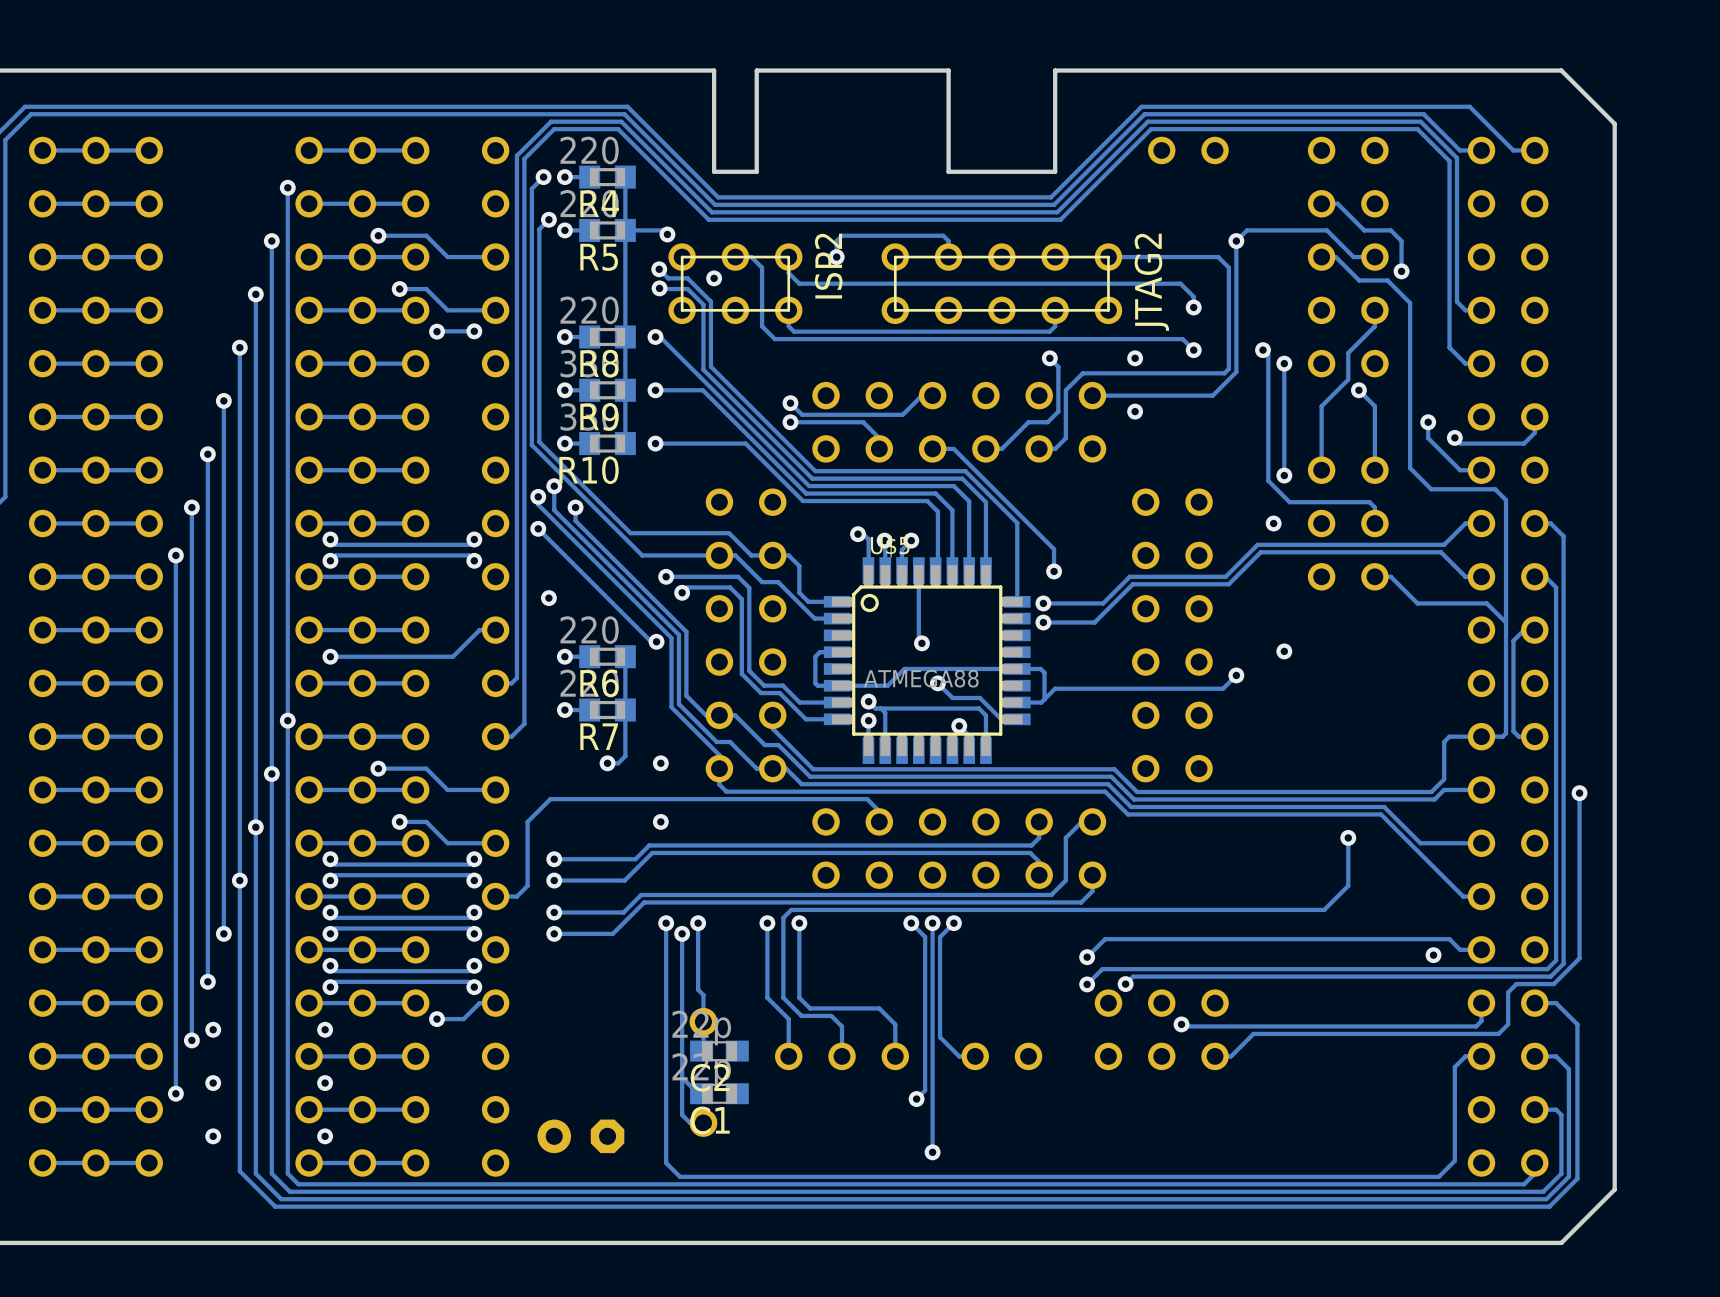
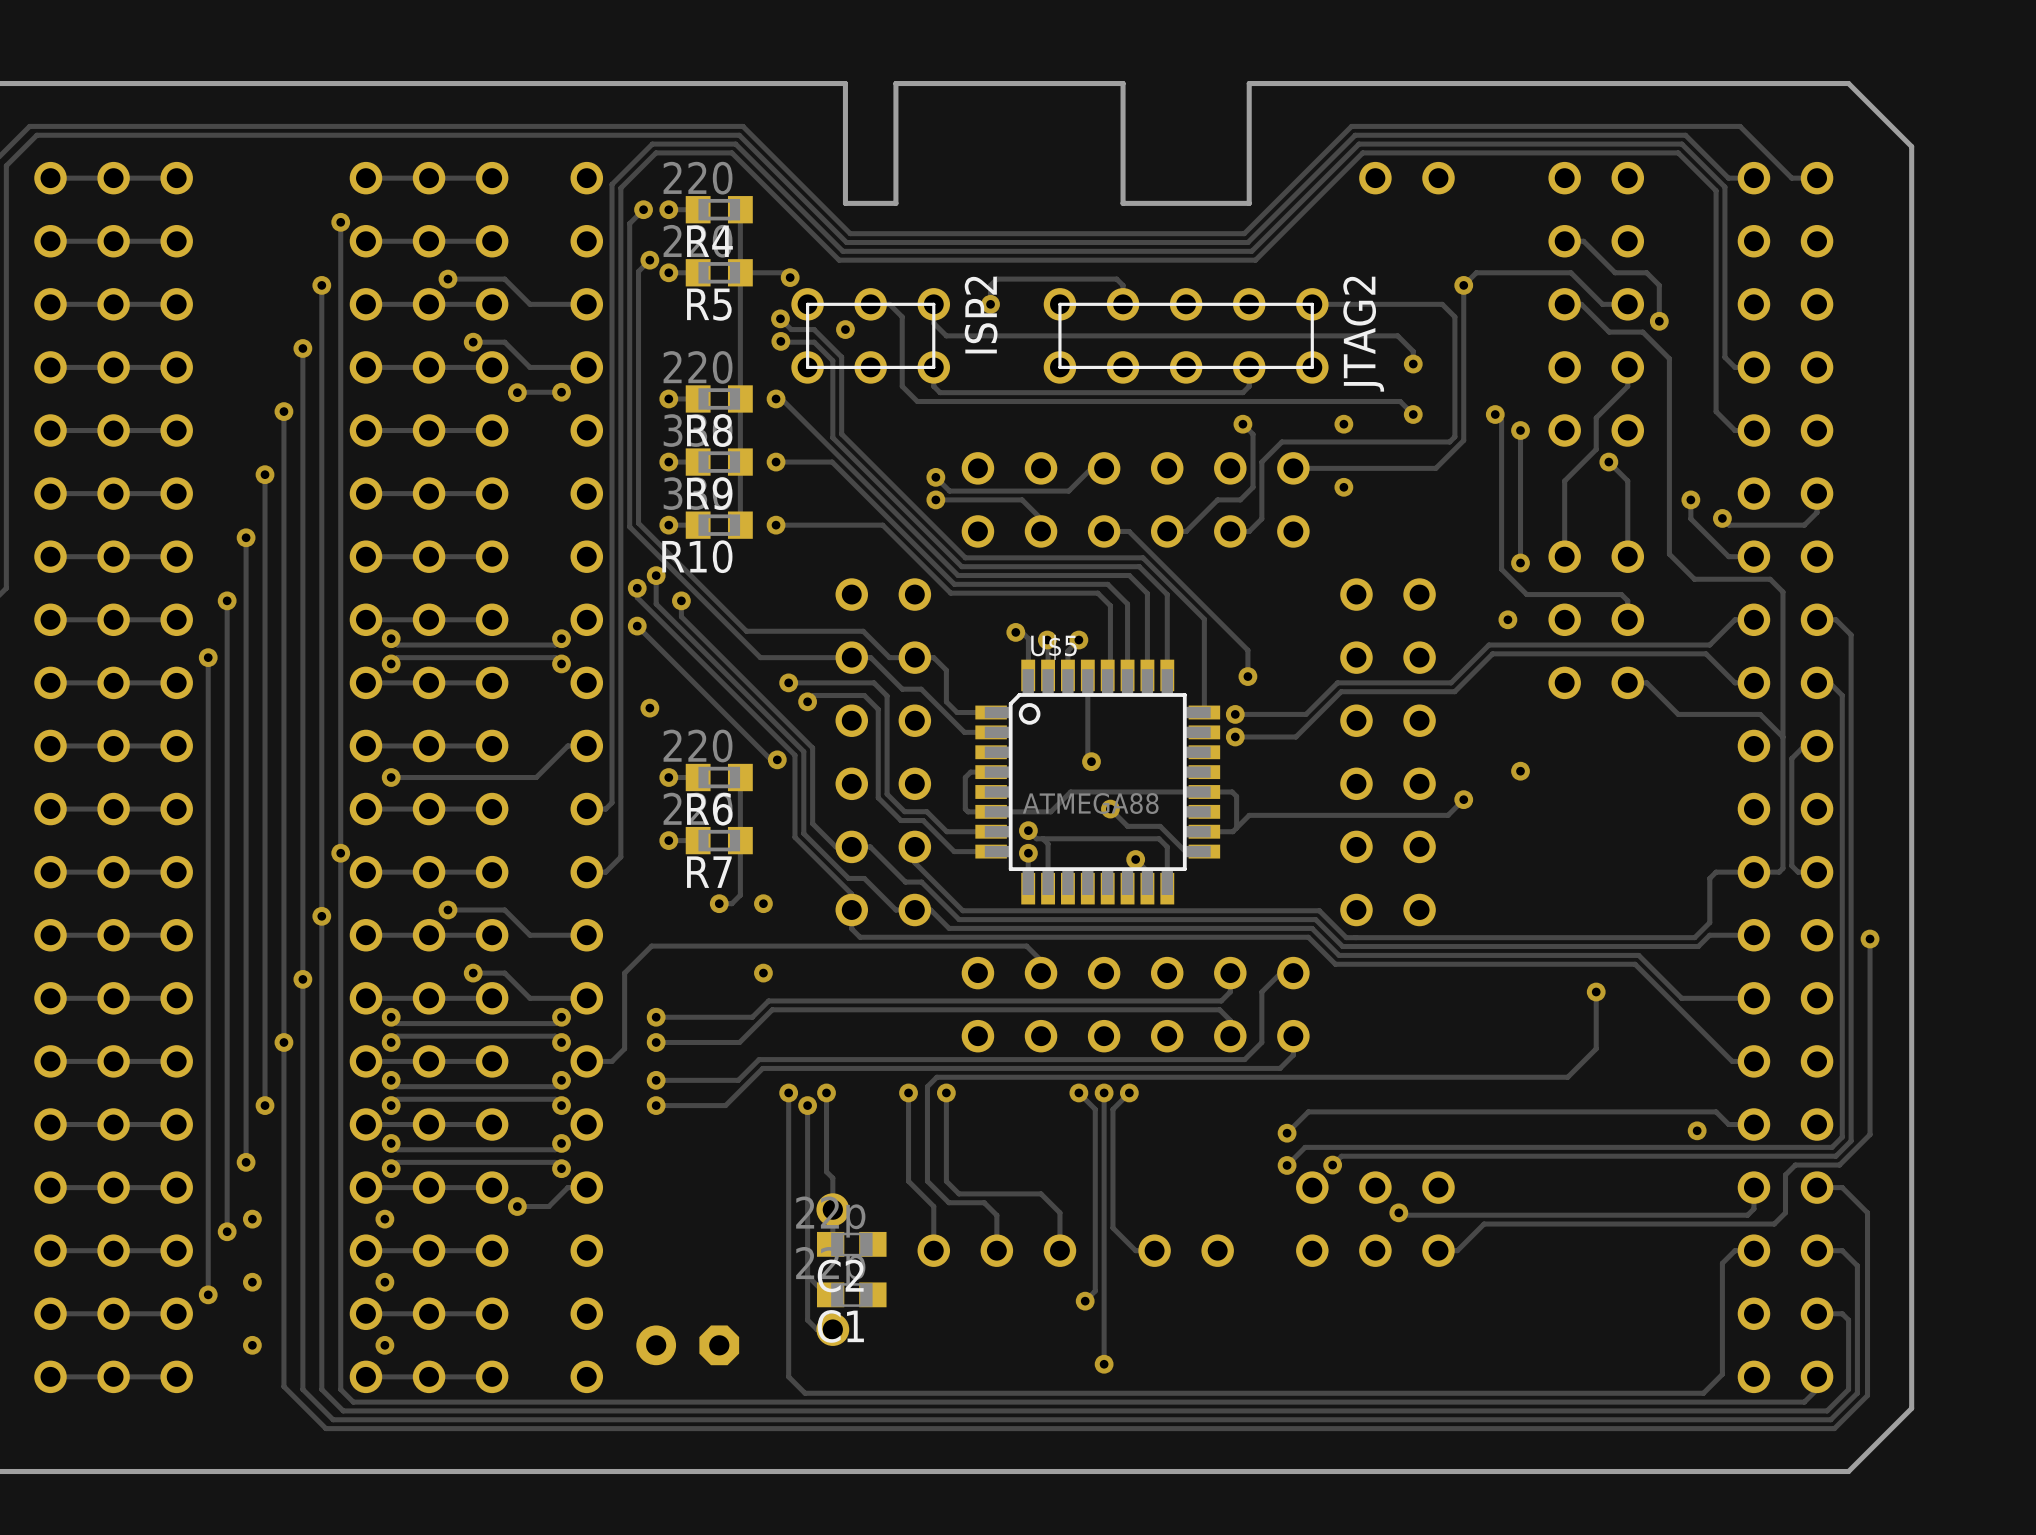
via position: (660, 763) -> (763, 903)
via position: (660, 821) -> (763, 973)

